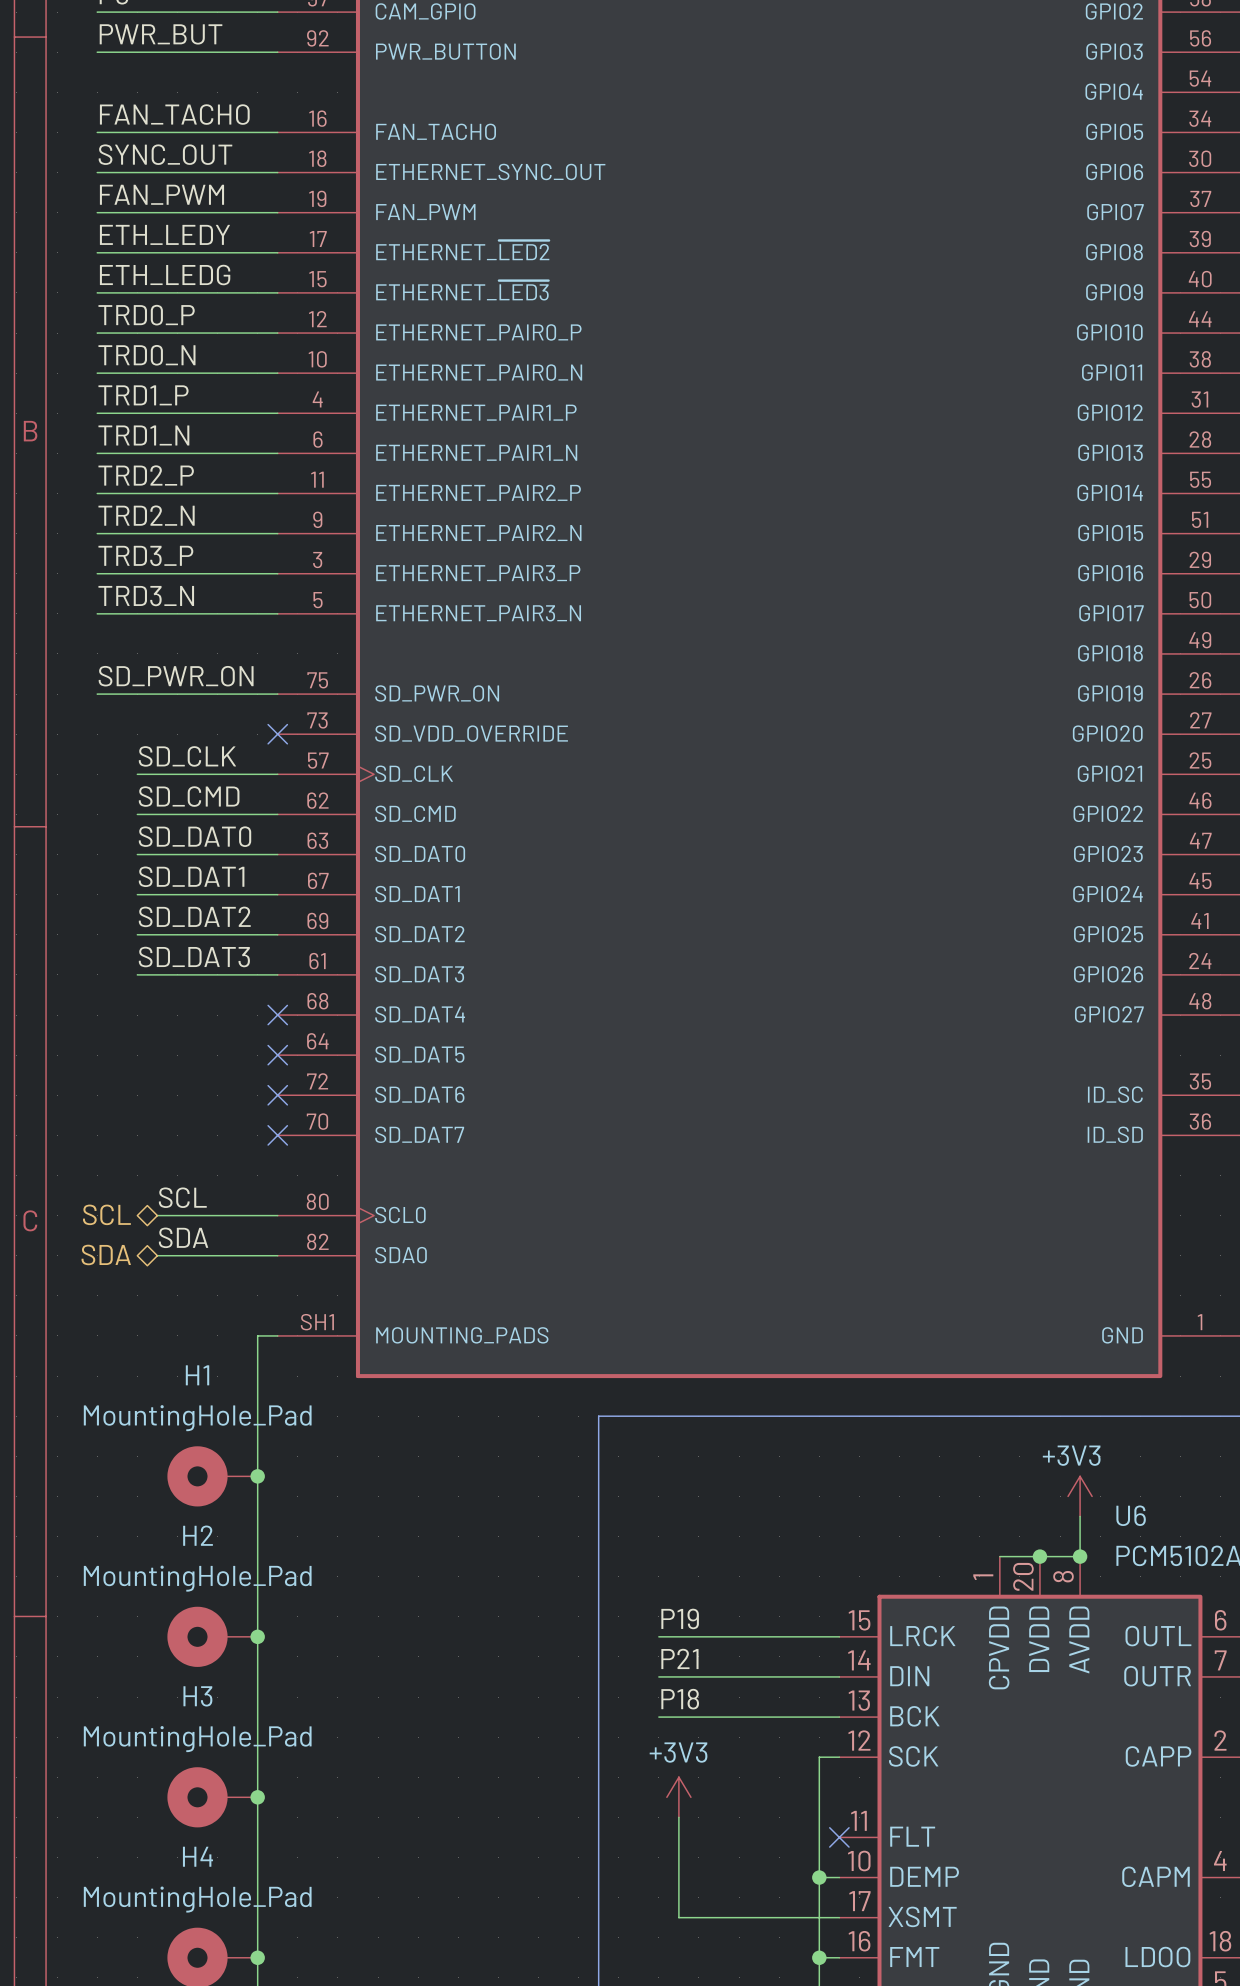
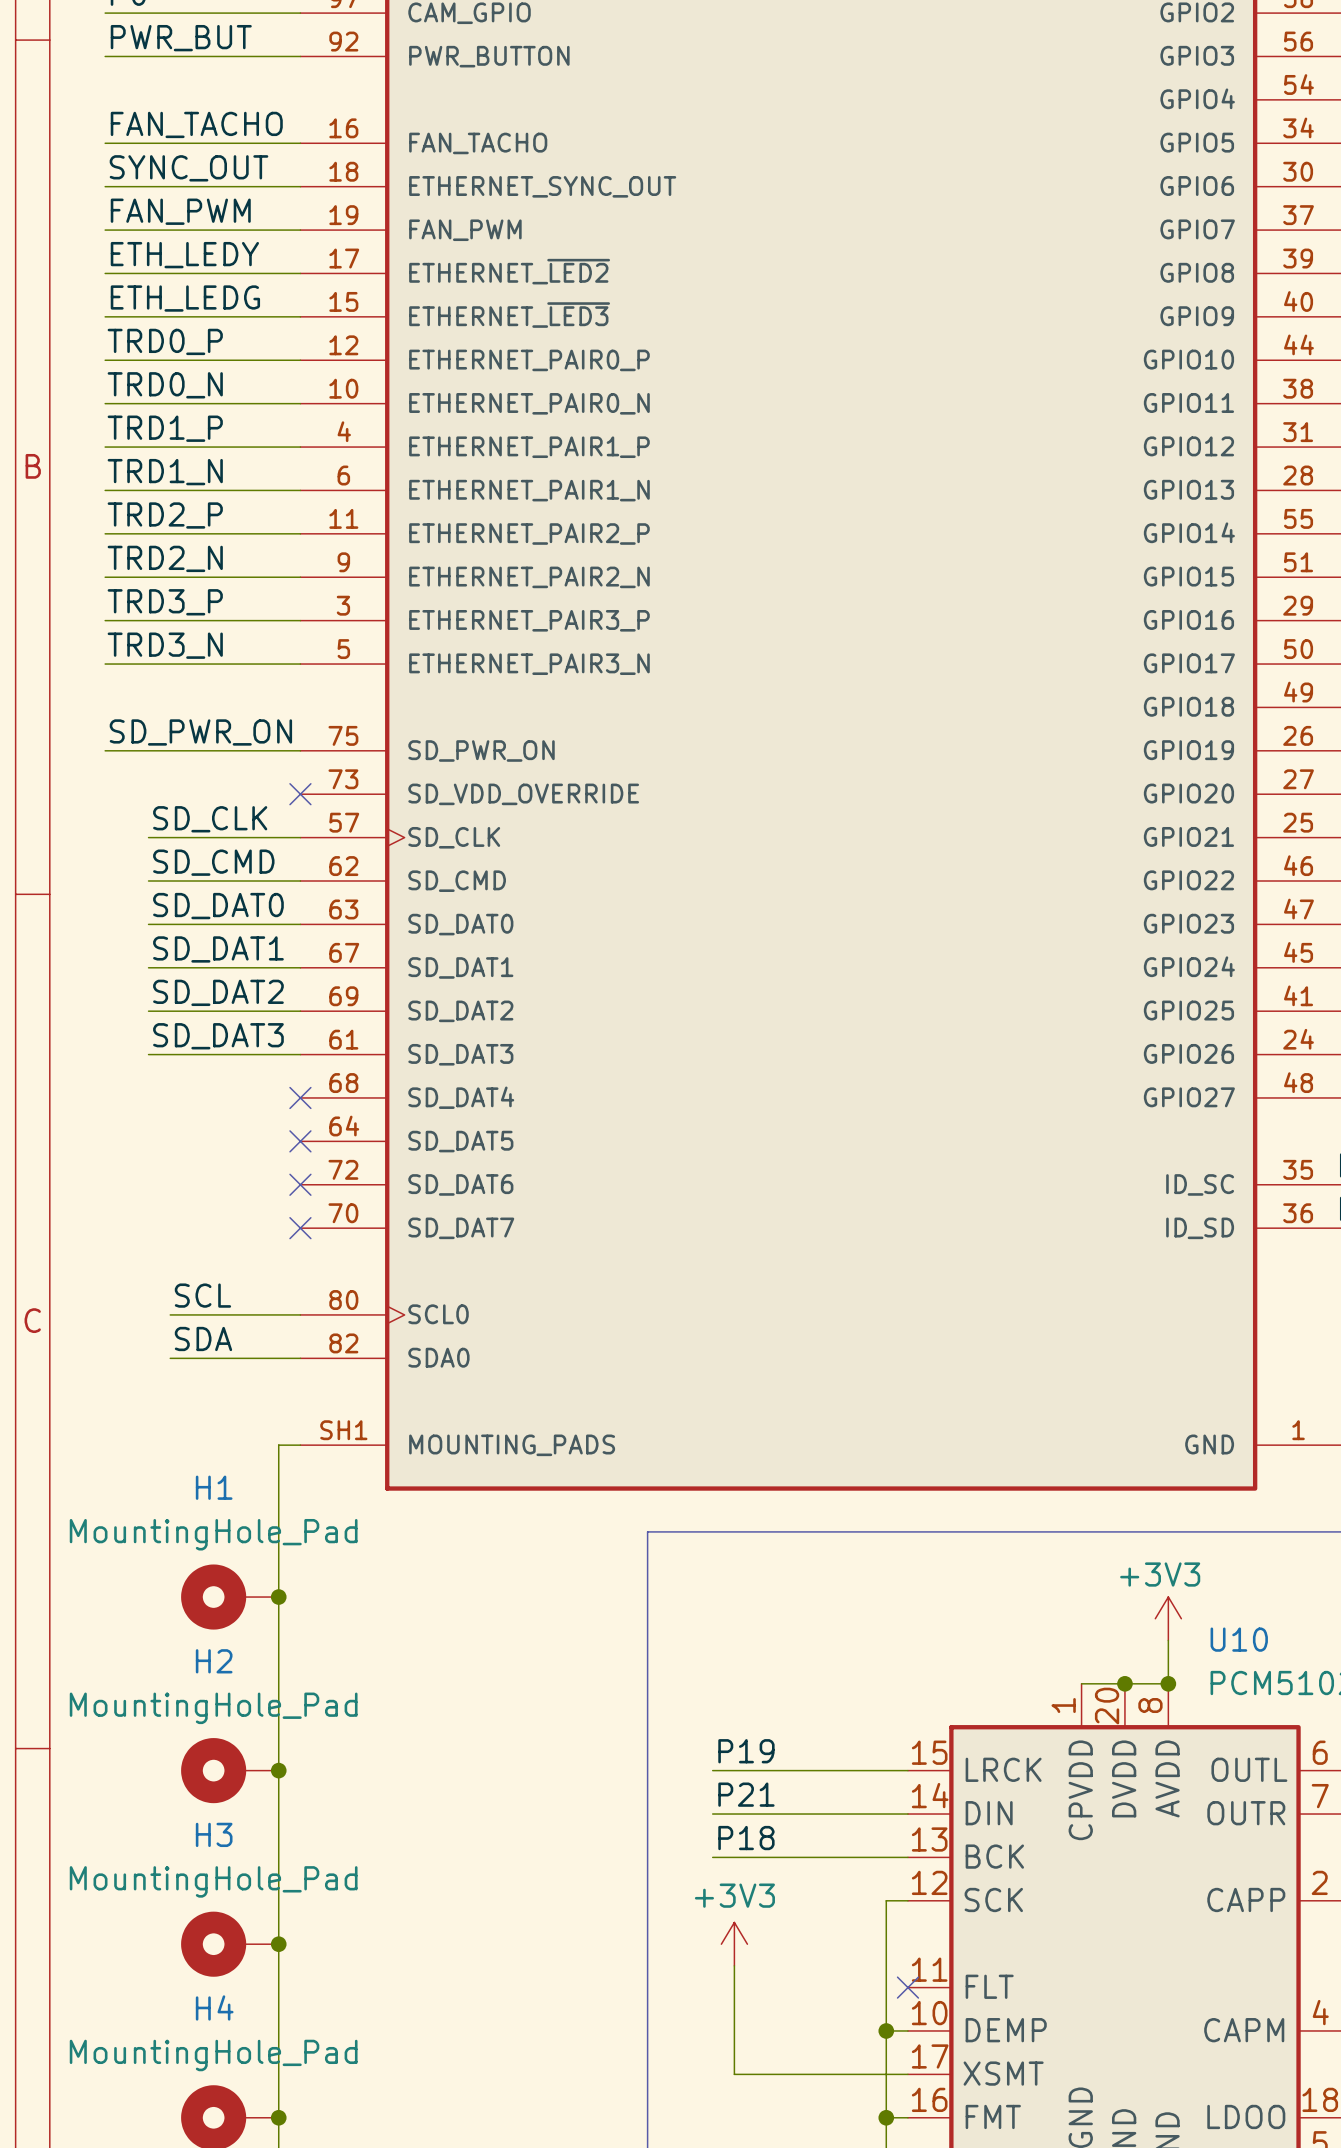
hierarchical label: SCL (106, 1214) -> none
hierarchical label: SDA (106, 1254) -> none
U6 name: U6 (1131, 1515) -> U10 (1239, 1639)

